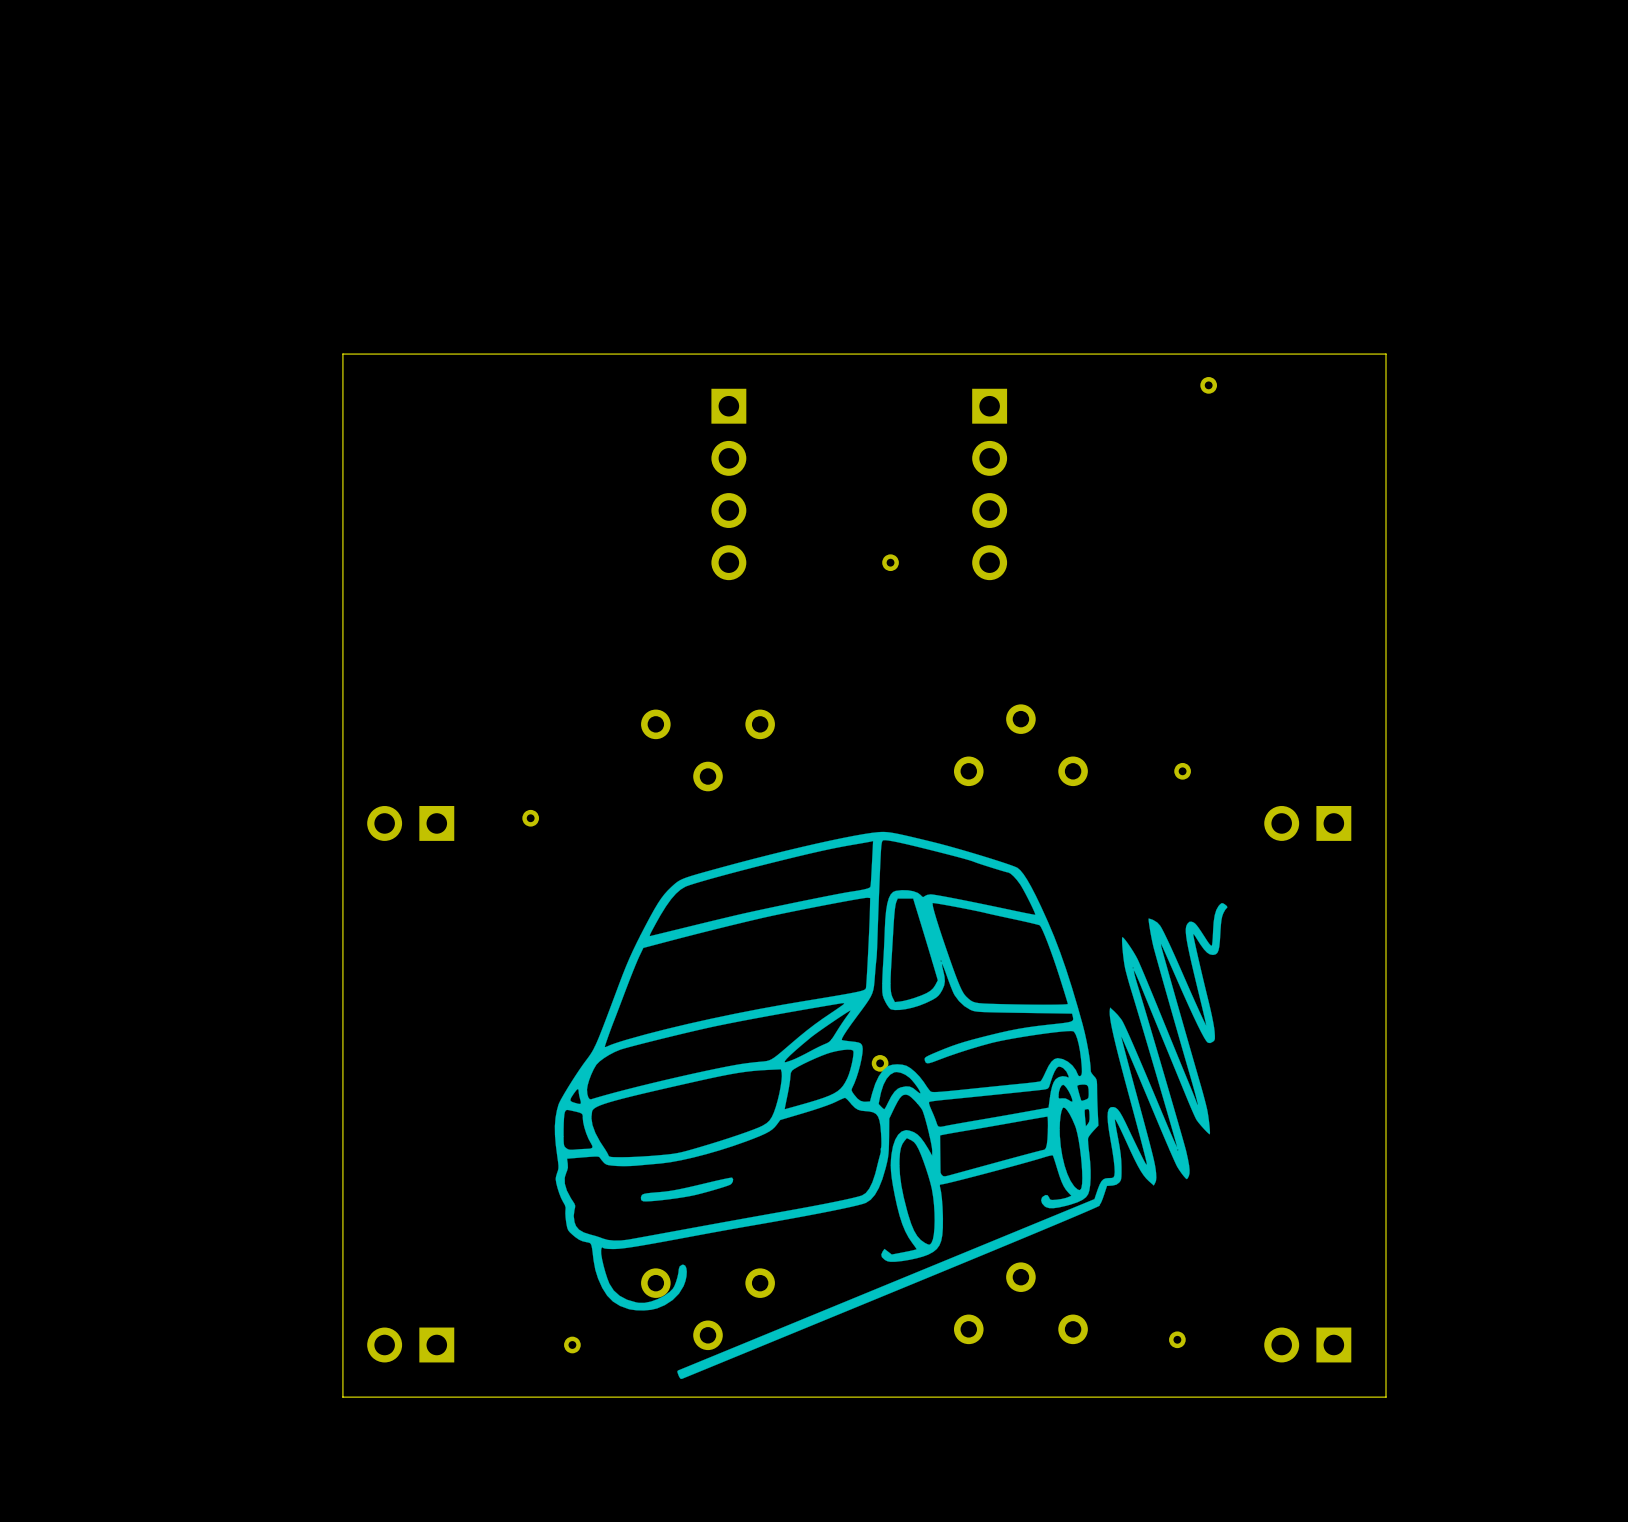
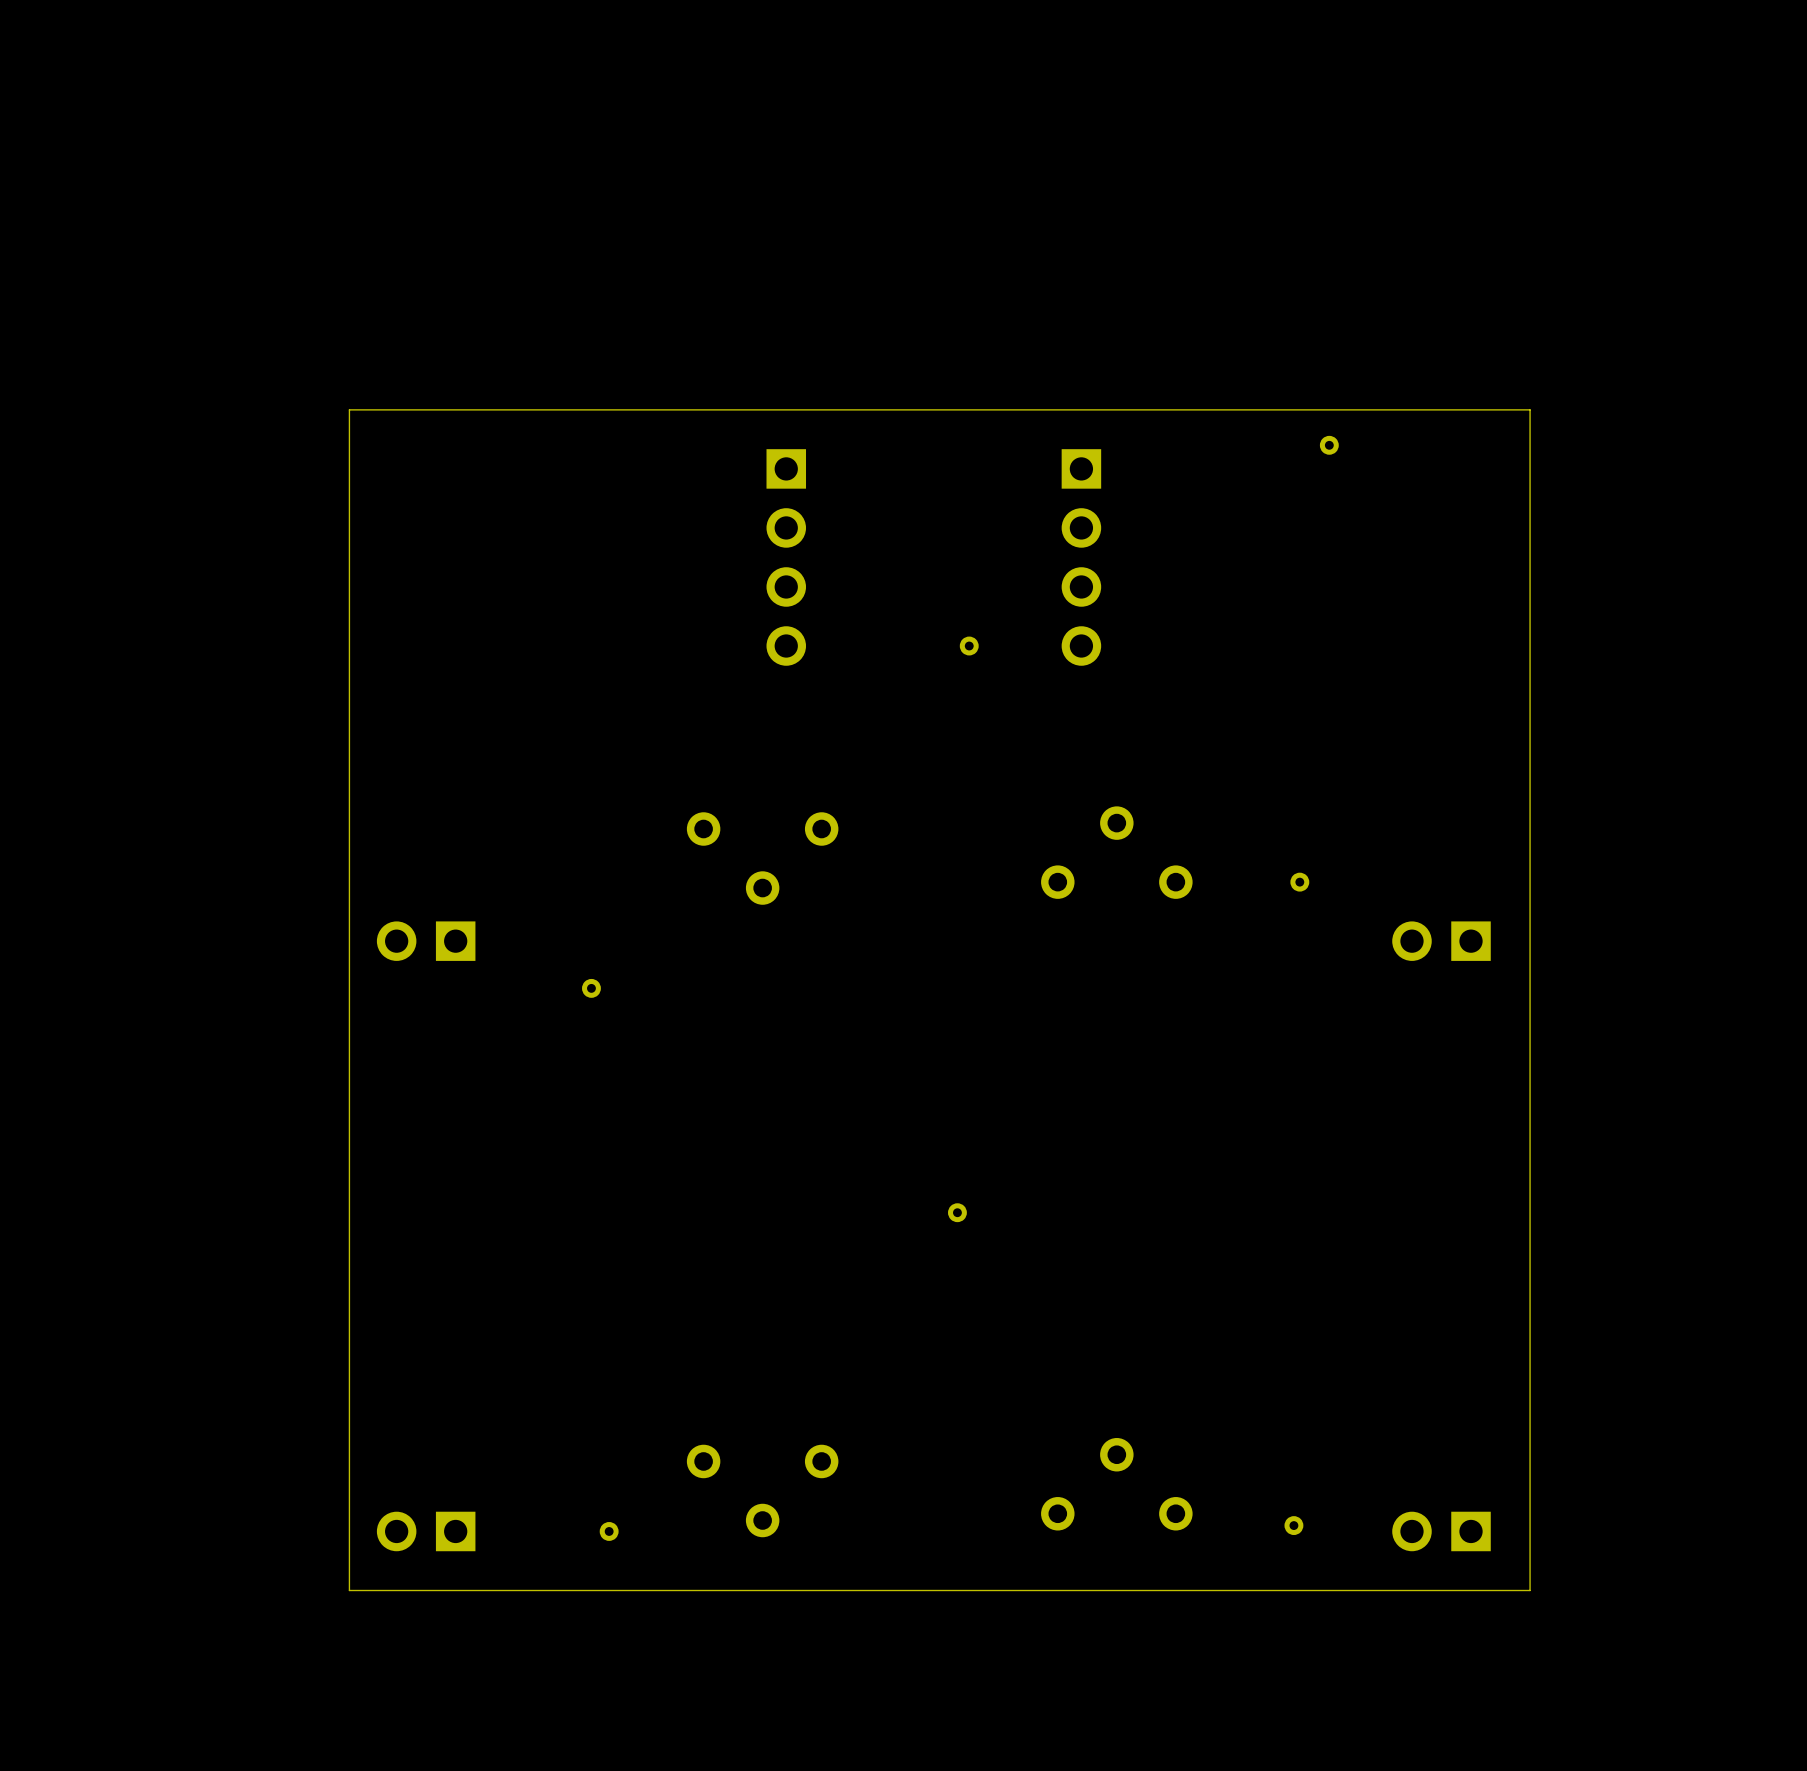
part position: (530, 818) -> (591, 988)
drawing: [554, 831, 1228, 1380] -> none

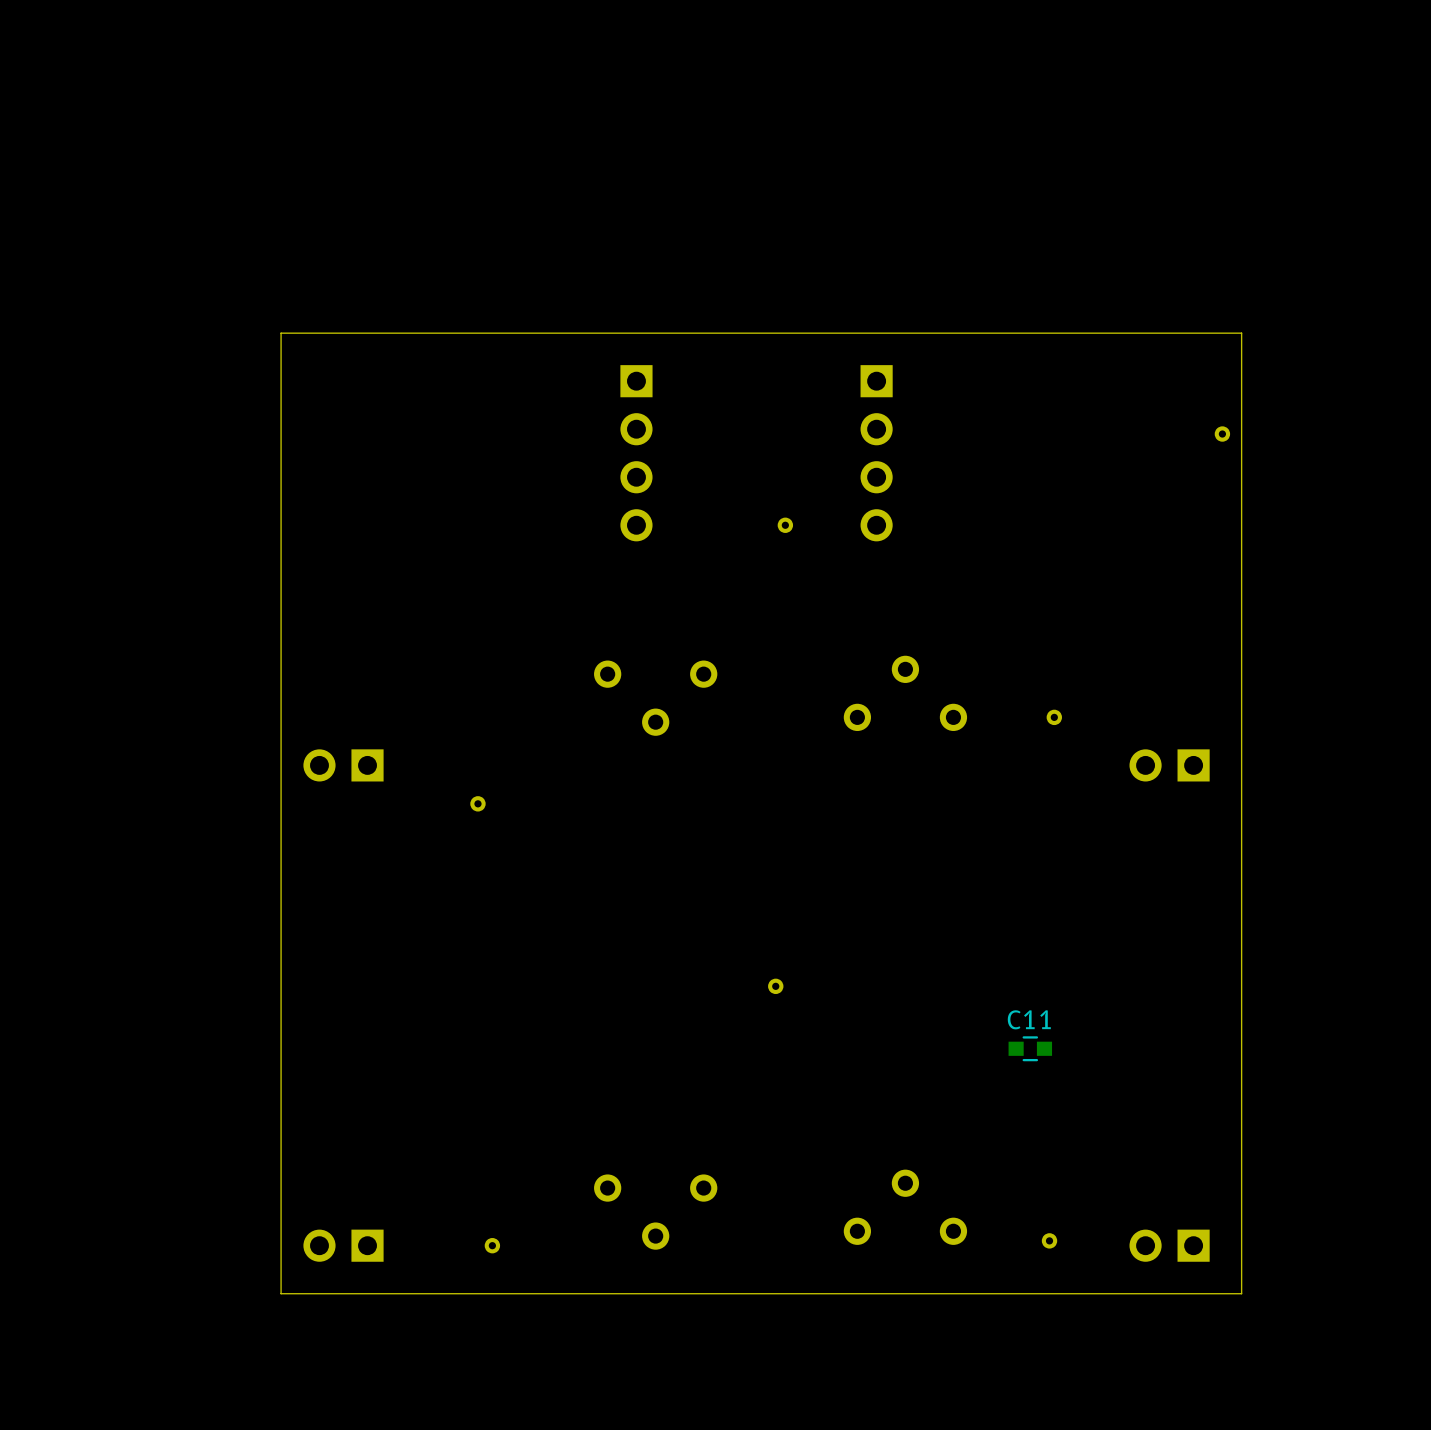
part position: (1329, 445) -> (1222, 434)
part position: (762, 858) -> (655, 698)
C11: none -> (1030, 1048)
part position: (762, 1490) -> (655, 1212)

